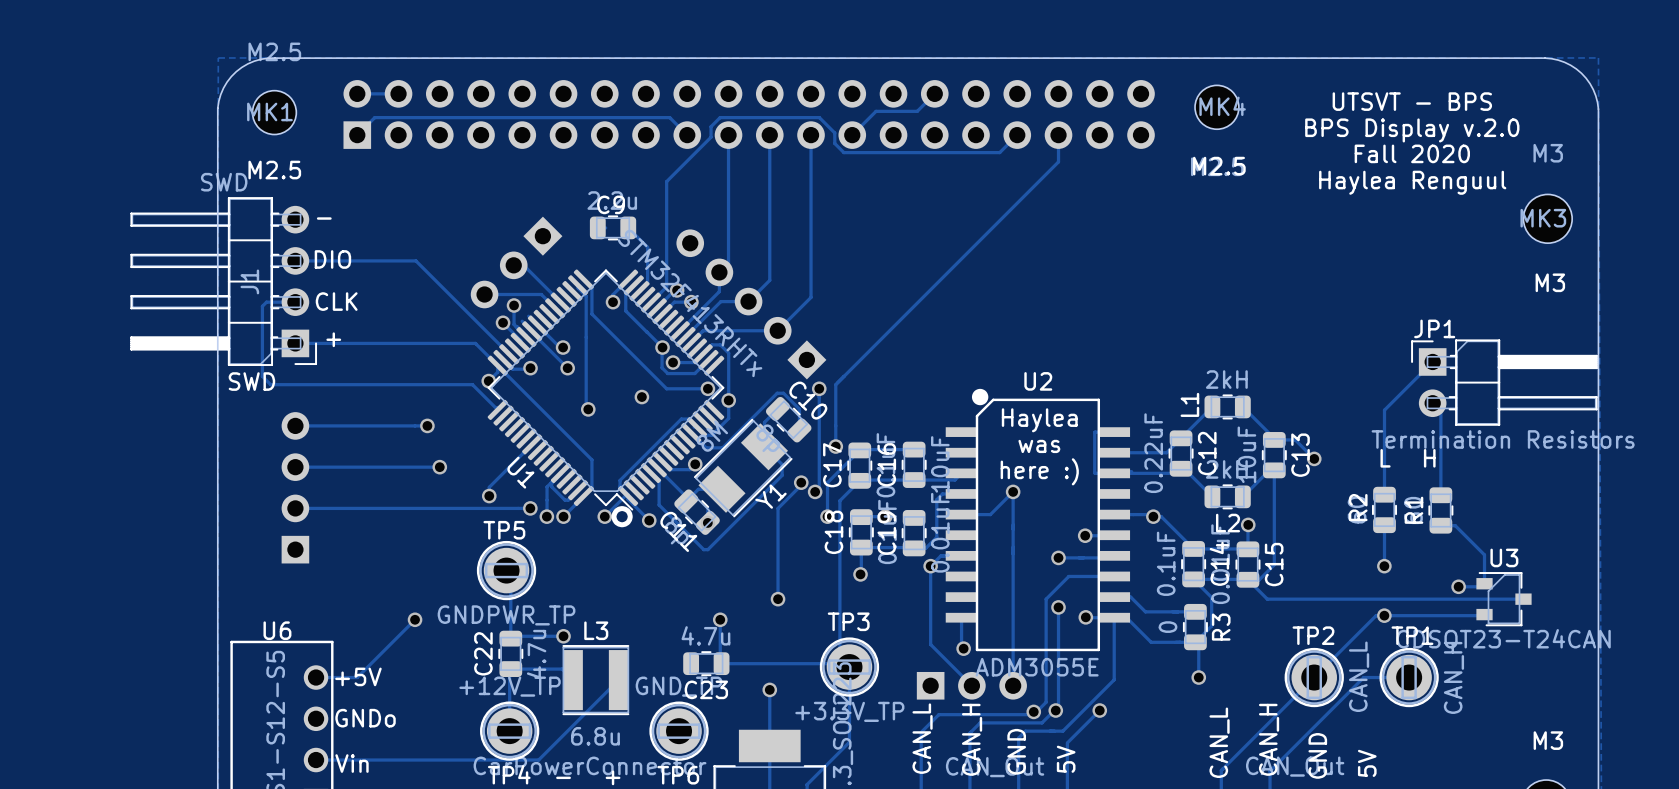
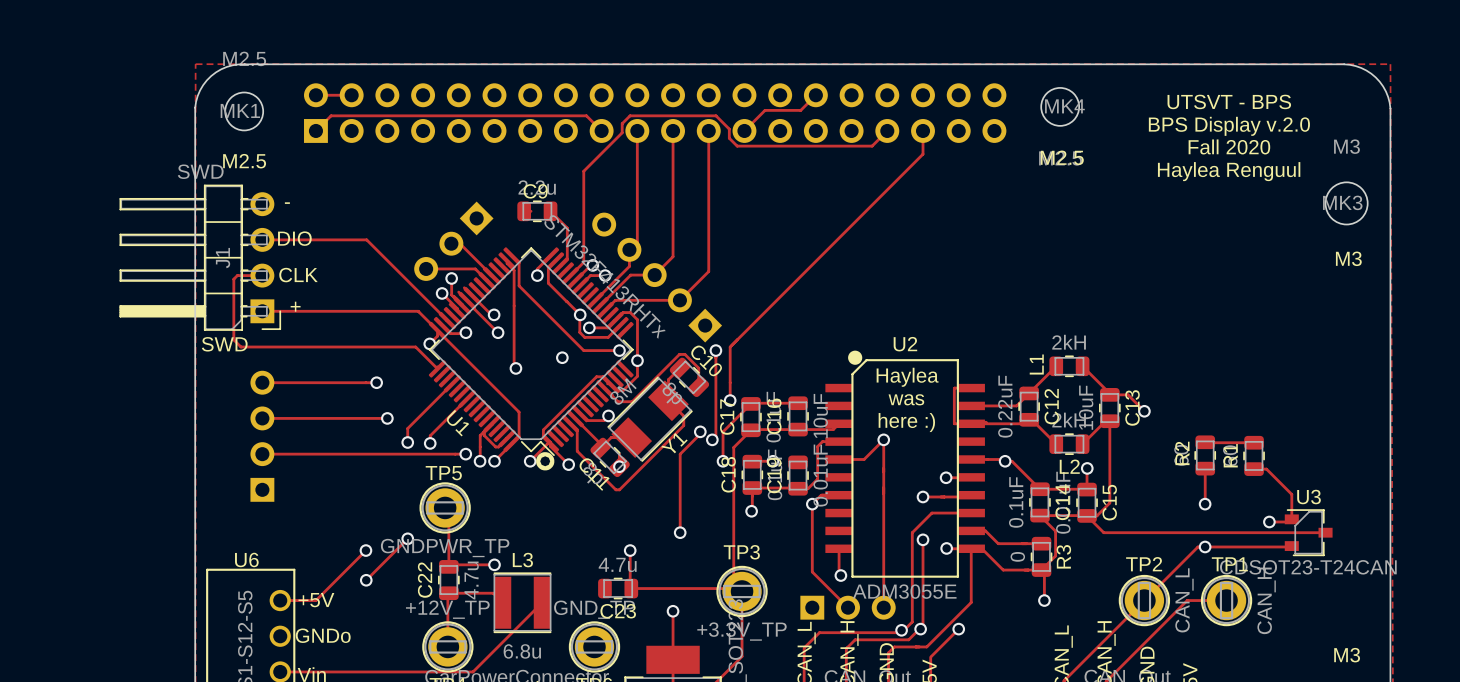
track: (1432, 361) (1384, 410) (1384, 494) (1387, 491) -> none
JP1: Termination Resistors (1504, 382) -> none
track: (1432, 403) (1440, 411) (1440, 495) -> (1205, 442) (1254, 442)
track: none -> (452, 383) (407, 428) (407, 442)
text: L (1385, 458) -> none
text: H (1429, 458) -> none
via: none -> (407, 442)
track: none -> (407, 538) (366, 580)
via: none -> (407, 538)
via: none -> (366, 580)

